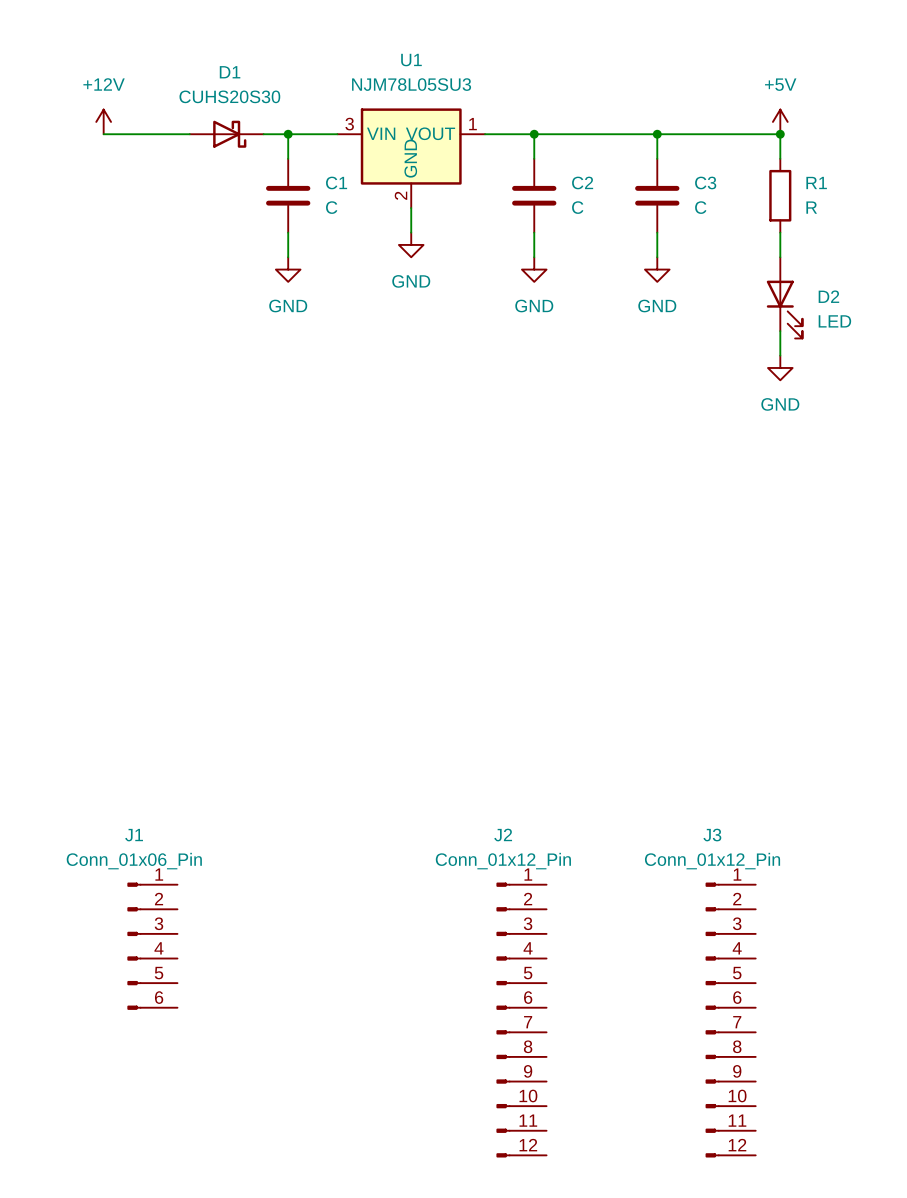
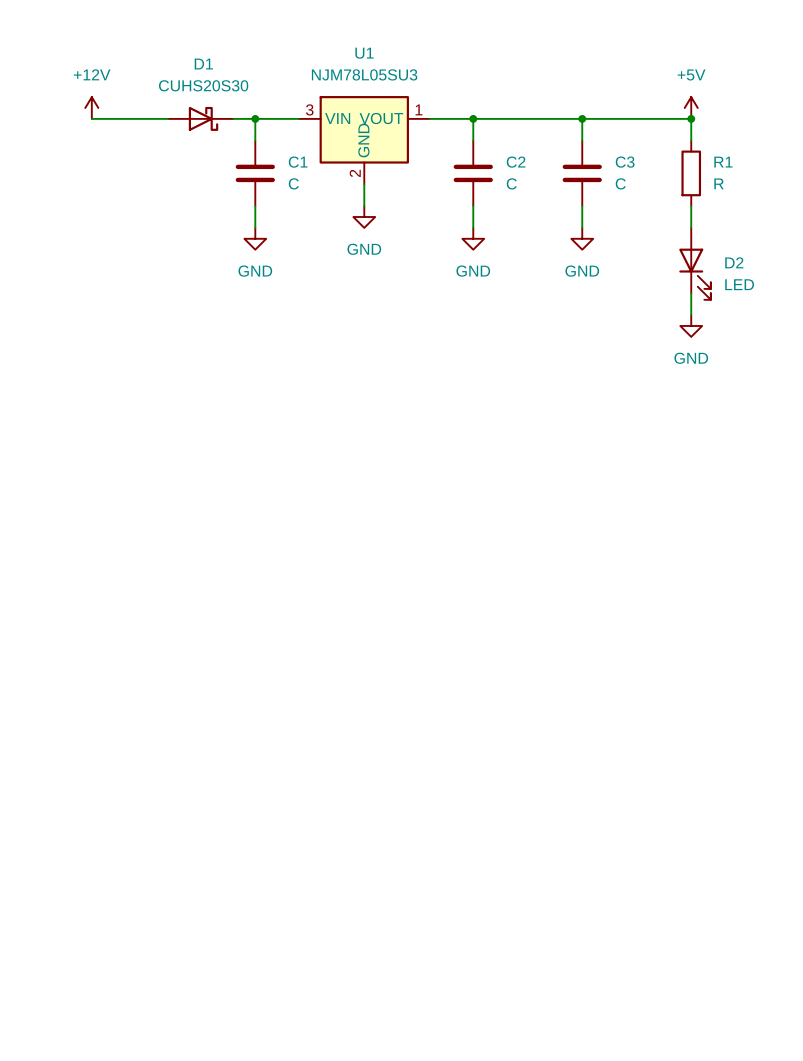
J1: Conn_01x06_Pin (152, 946) -> none
J2: Conn_01x12_Pin (521, 1020) -> none
J3: Conn_01x12_Pin (730, 1020) -> none

